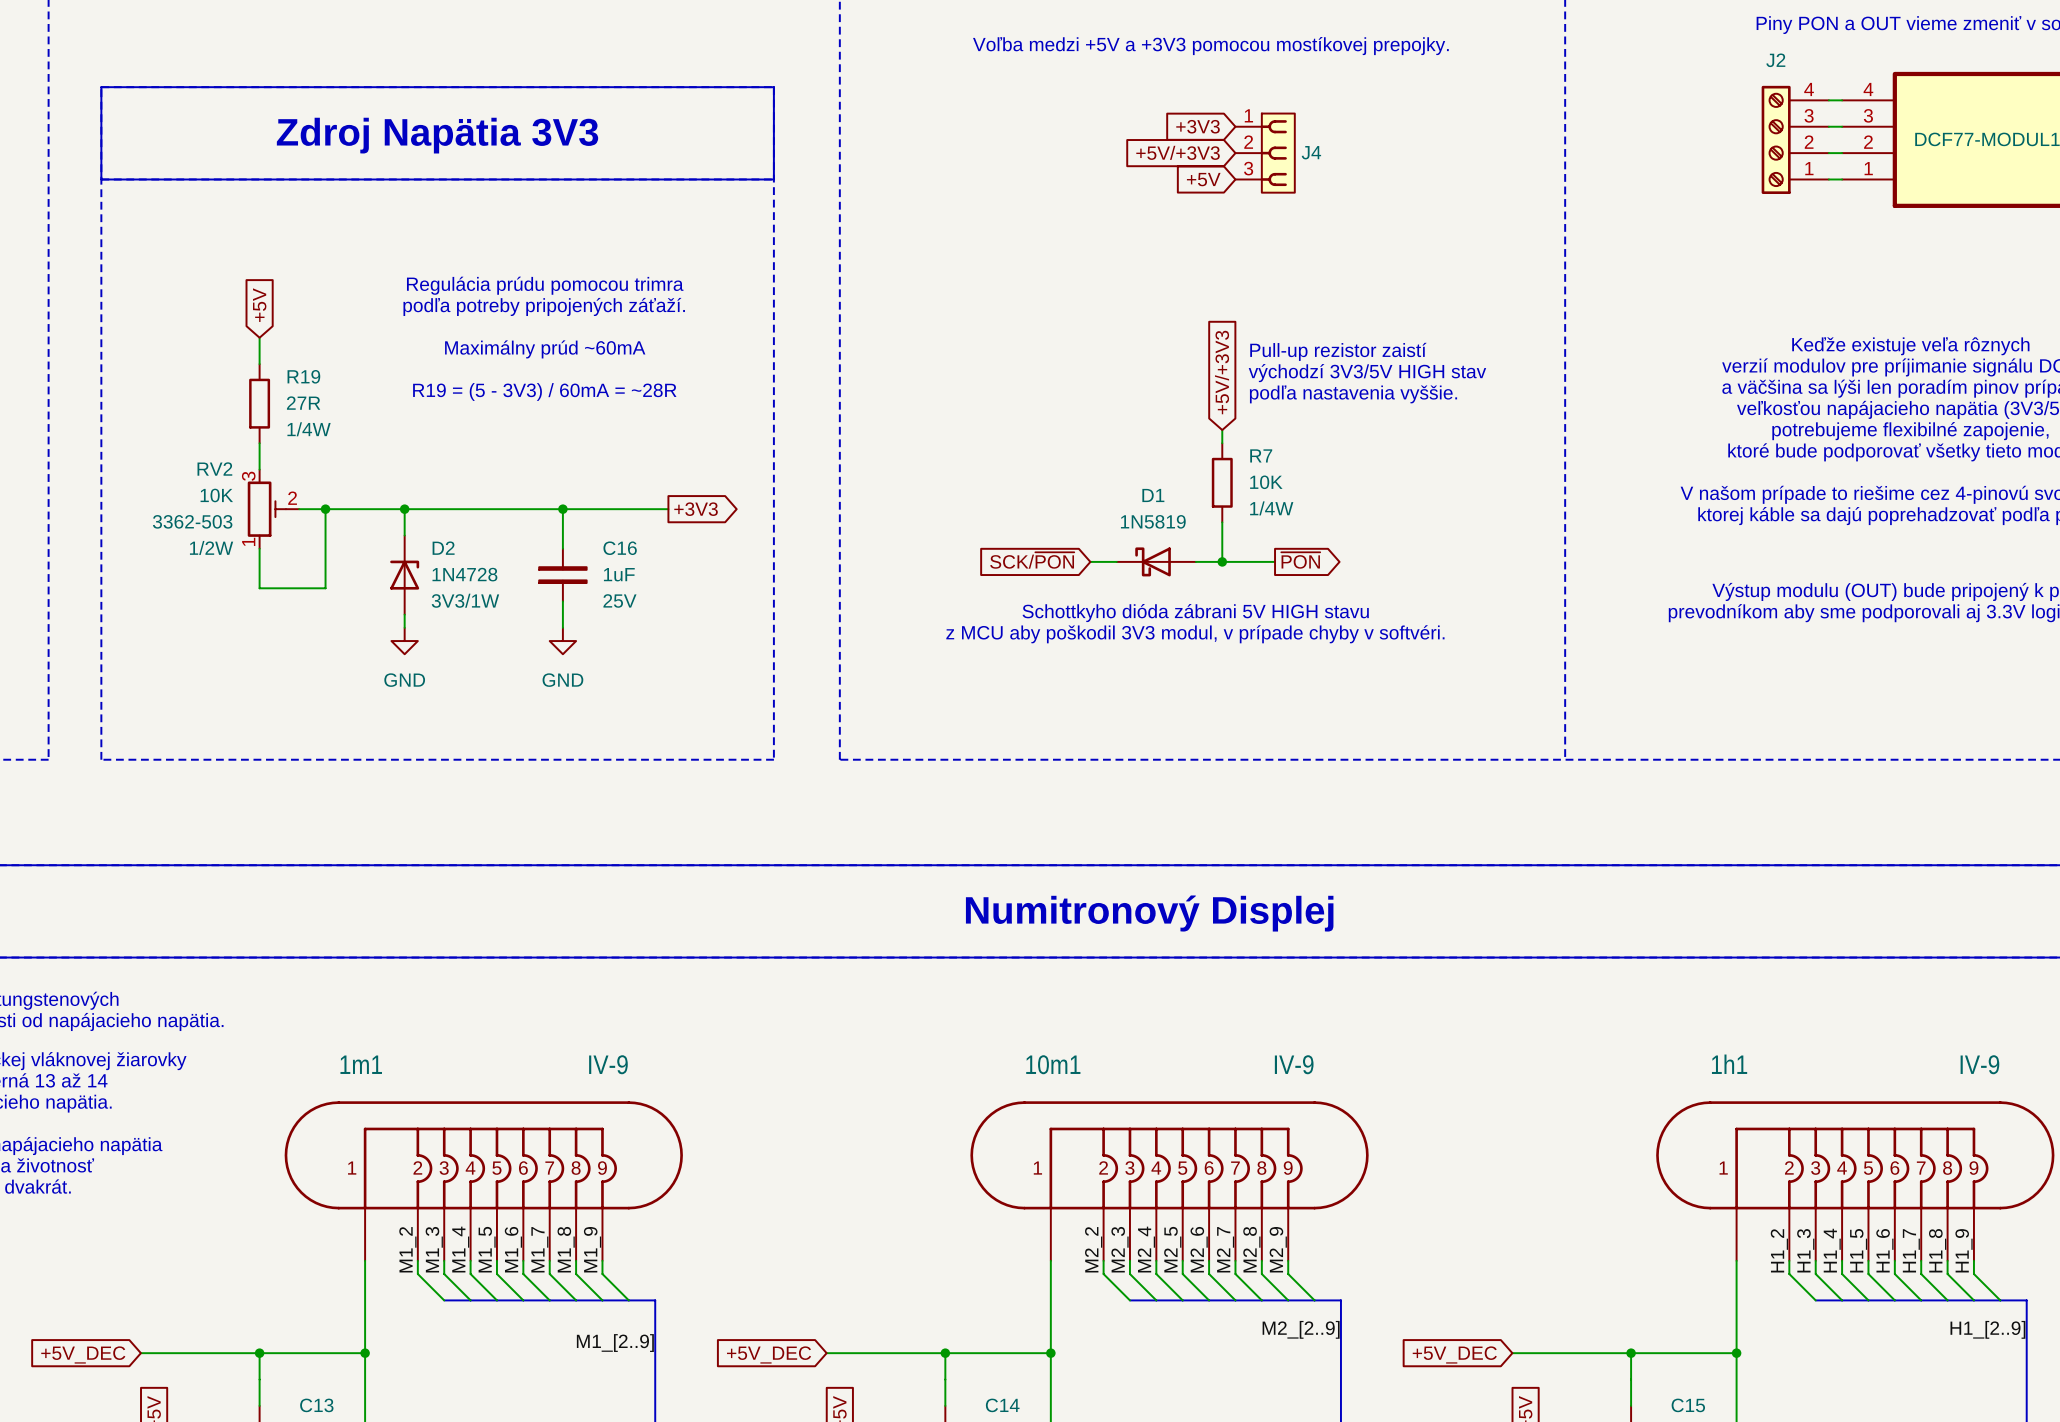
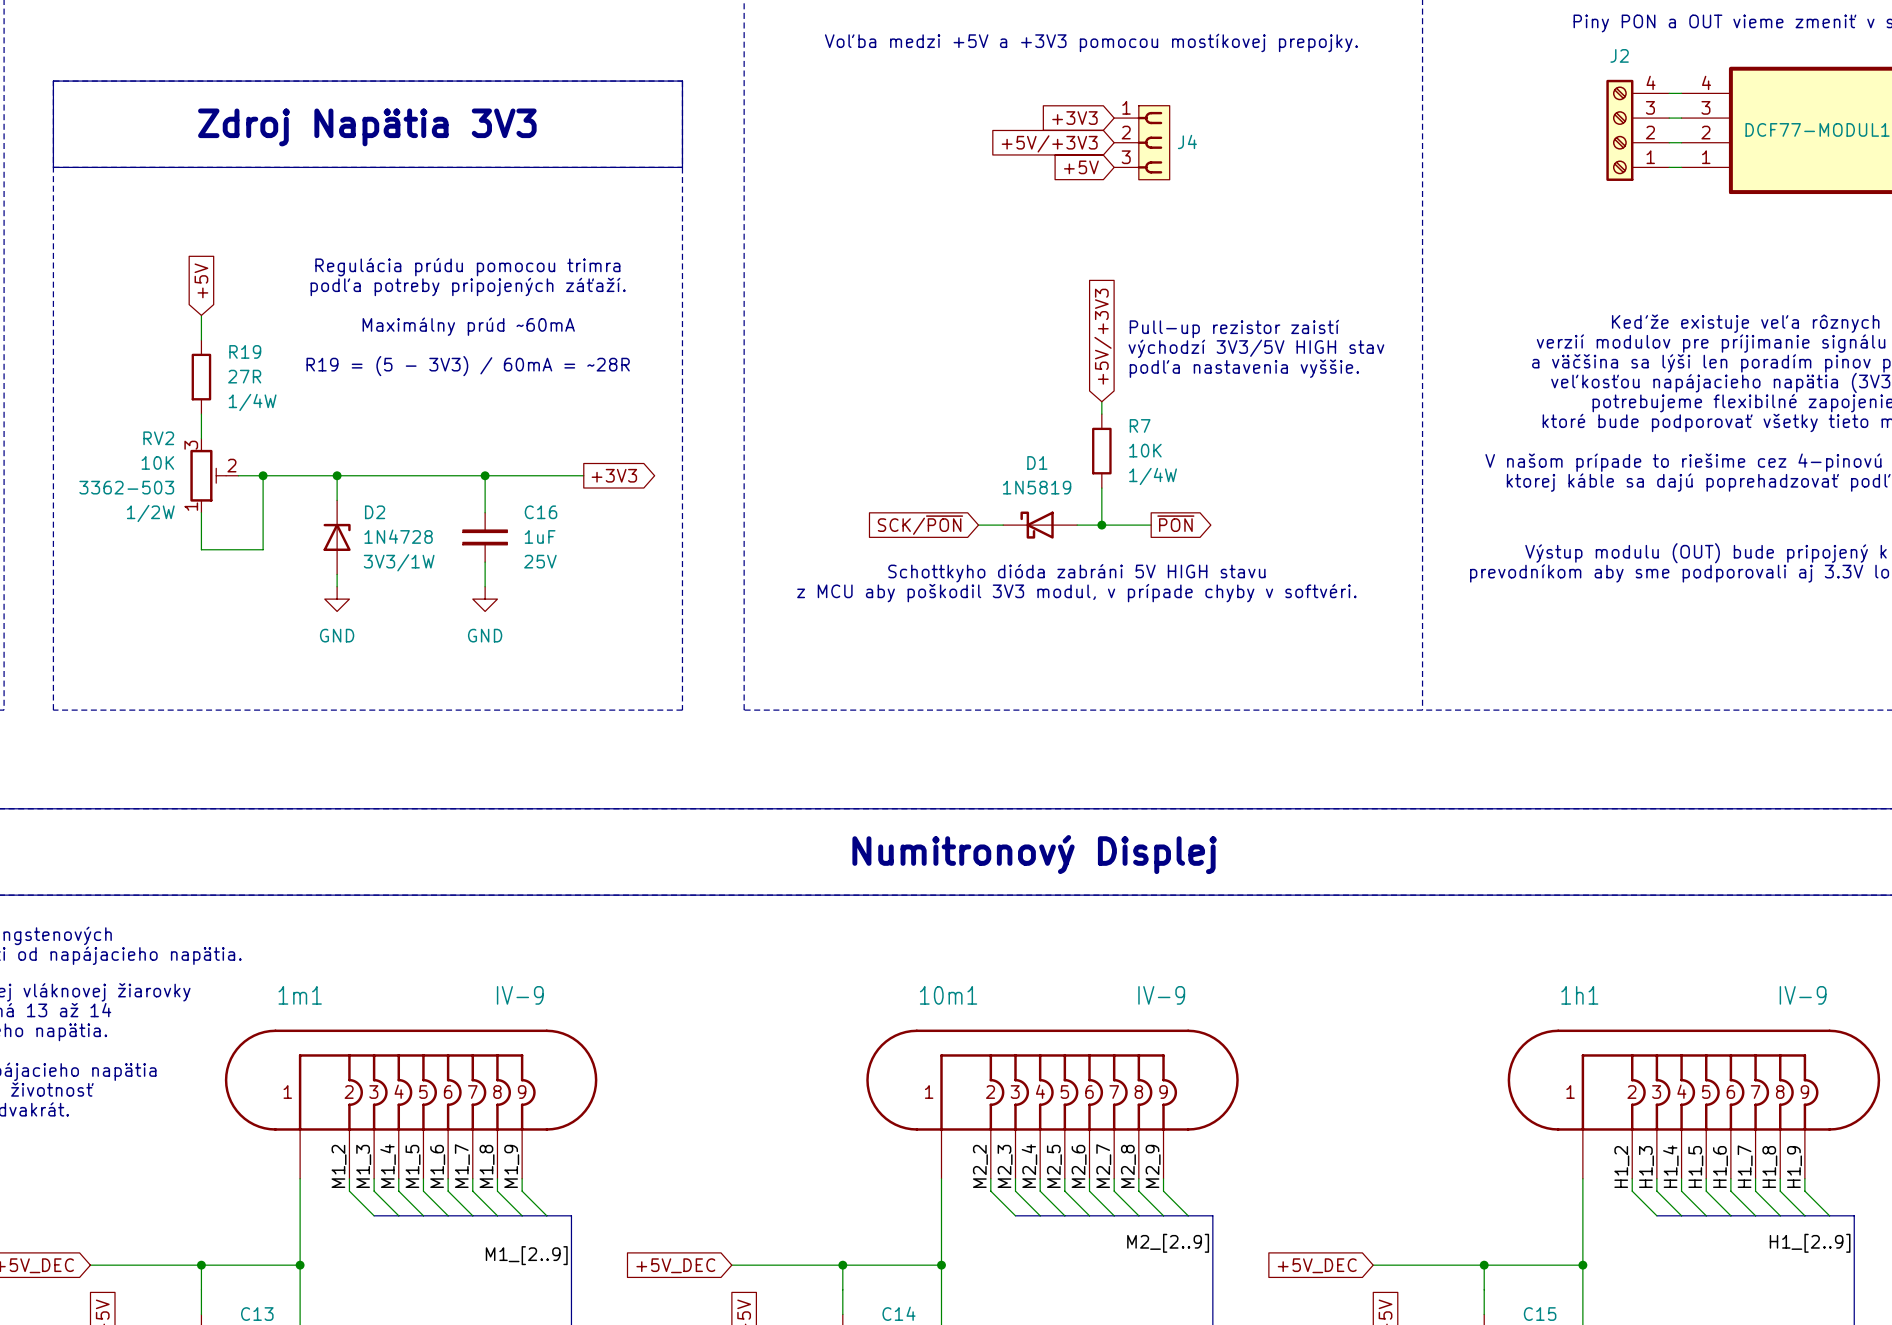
text: Schottkyho dióda zábrani 5V HIGH stavu (1195, 613) -> Schottkyho dióda zabráni 5V HIGH stavu (1076, 573)

